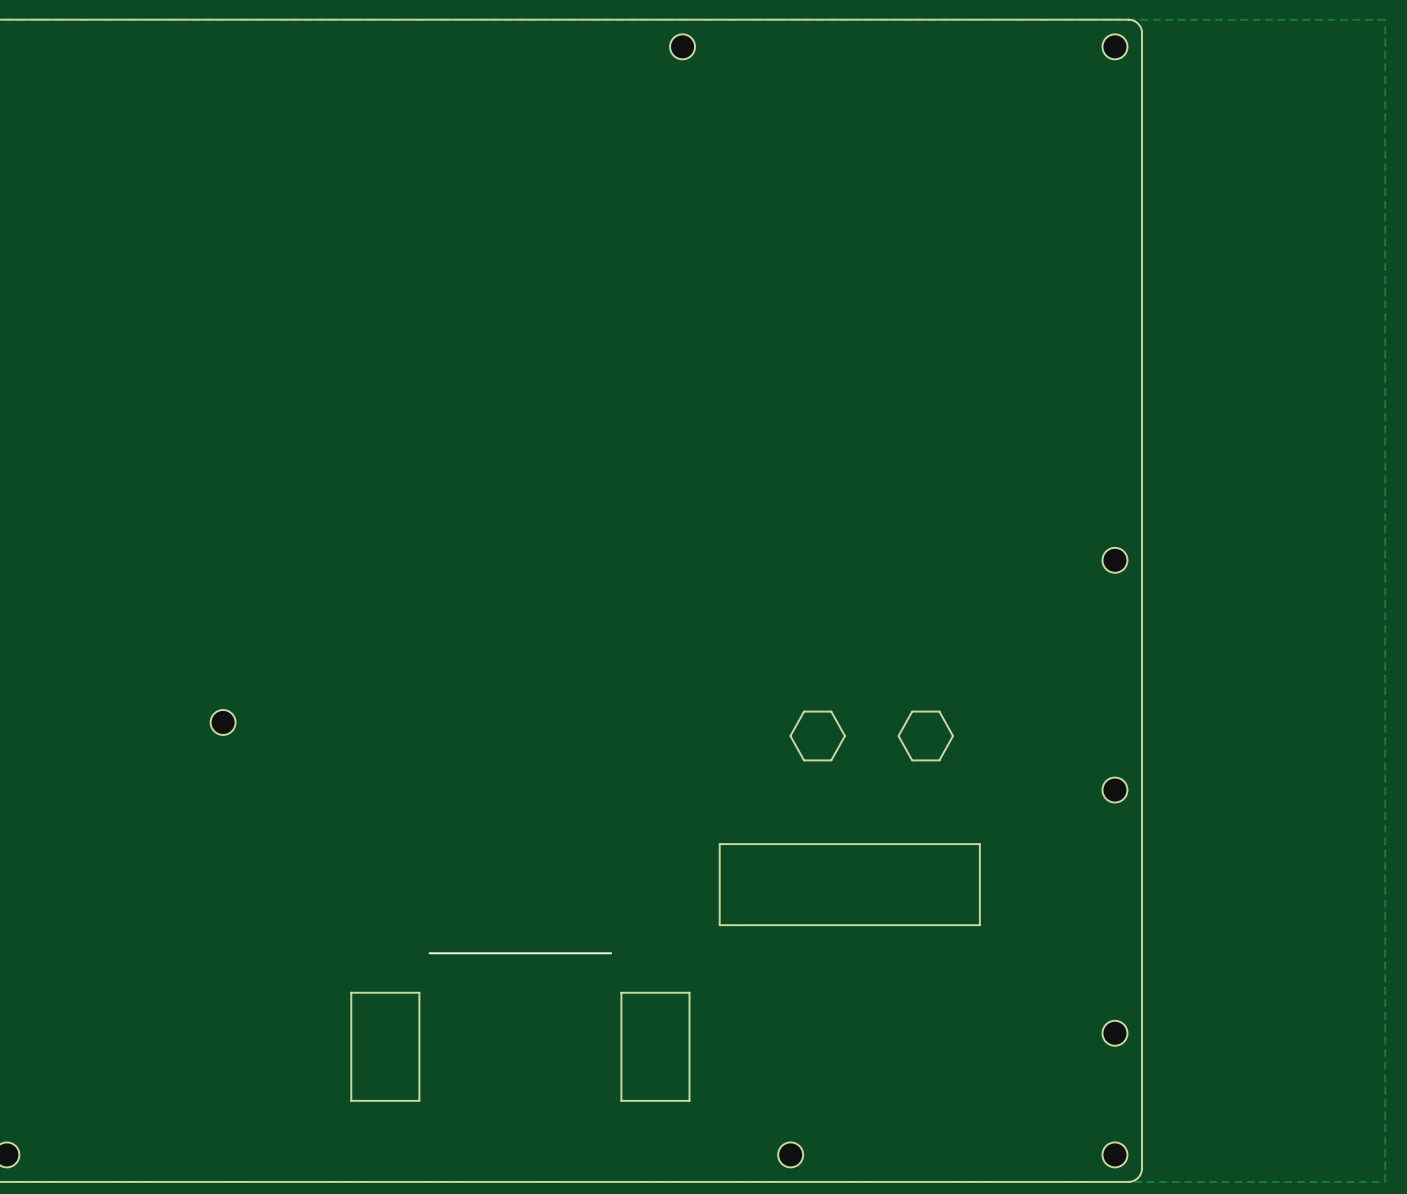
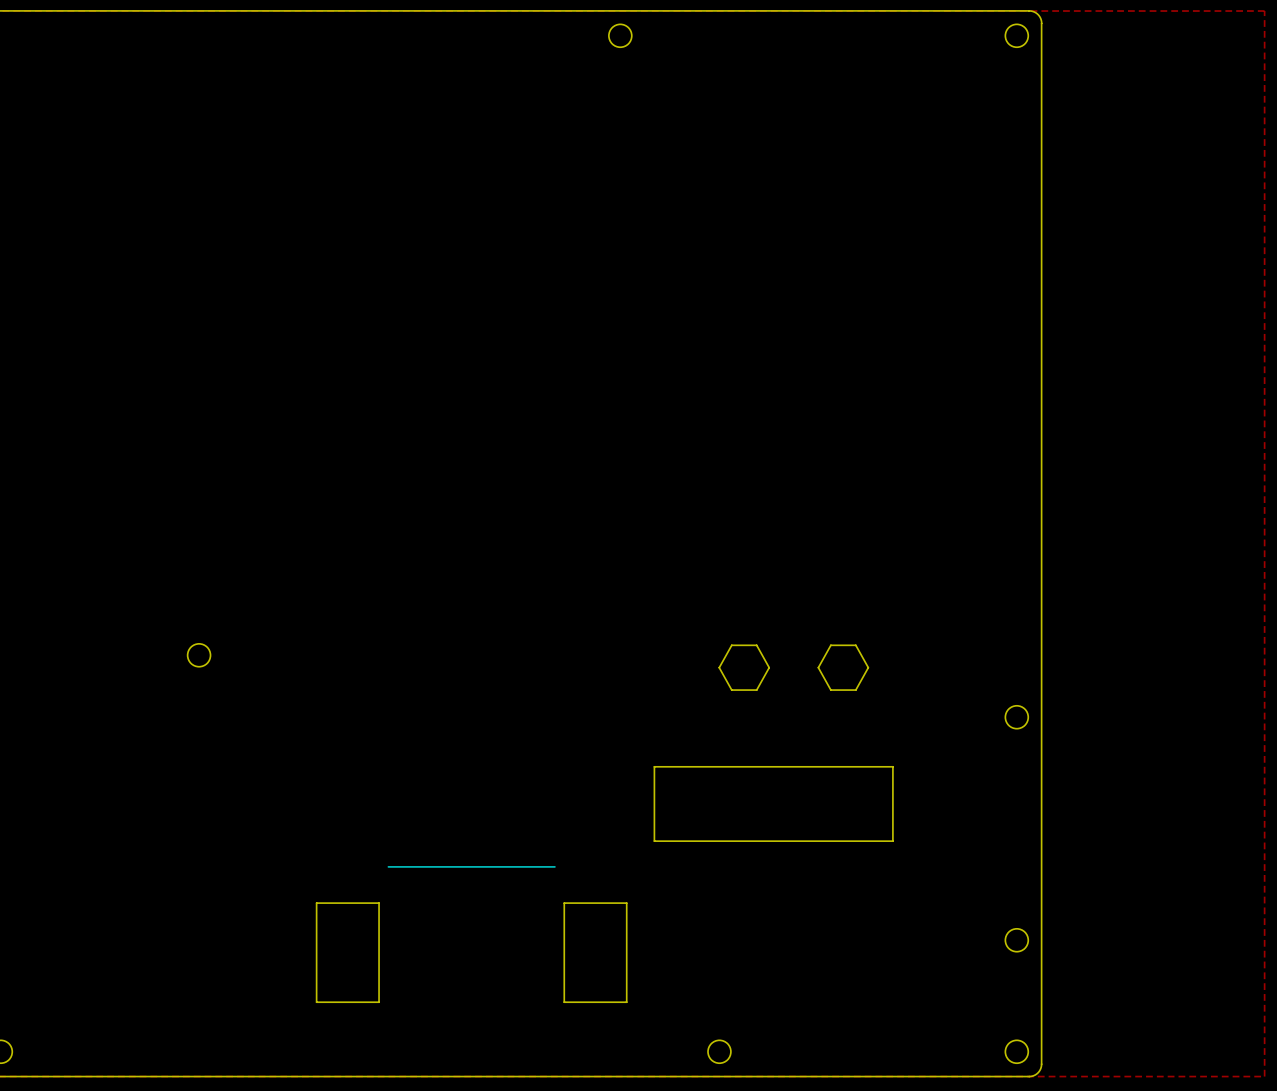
part: (1114, 560) -> none

